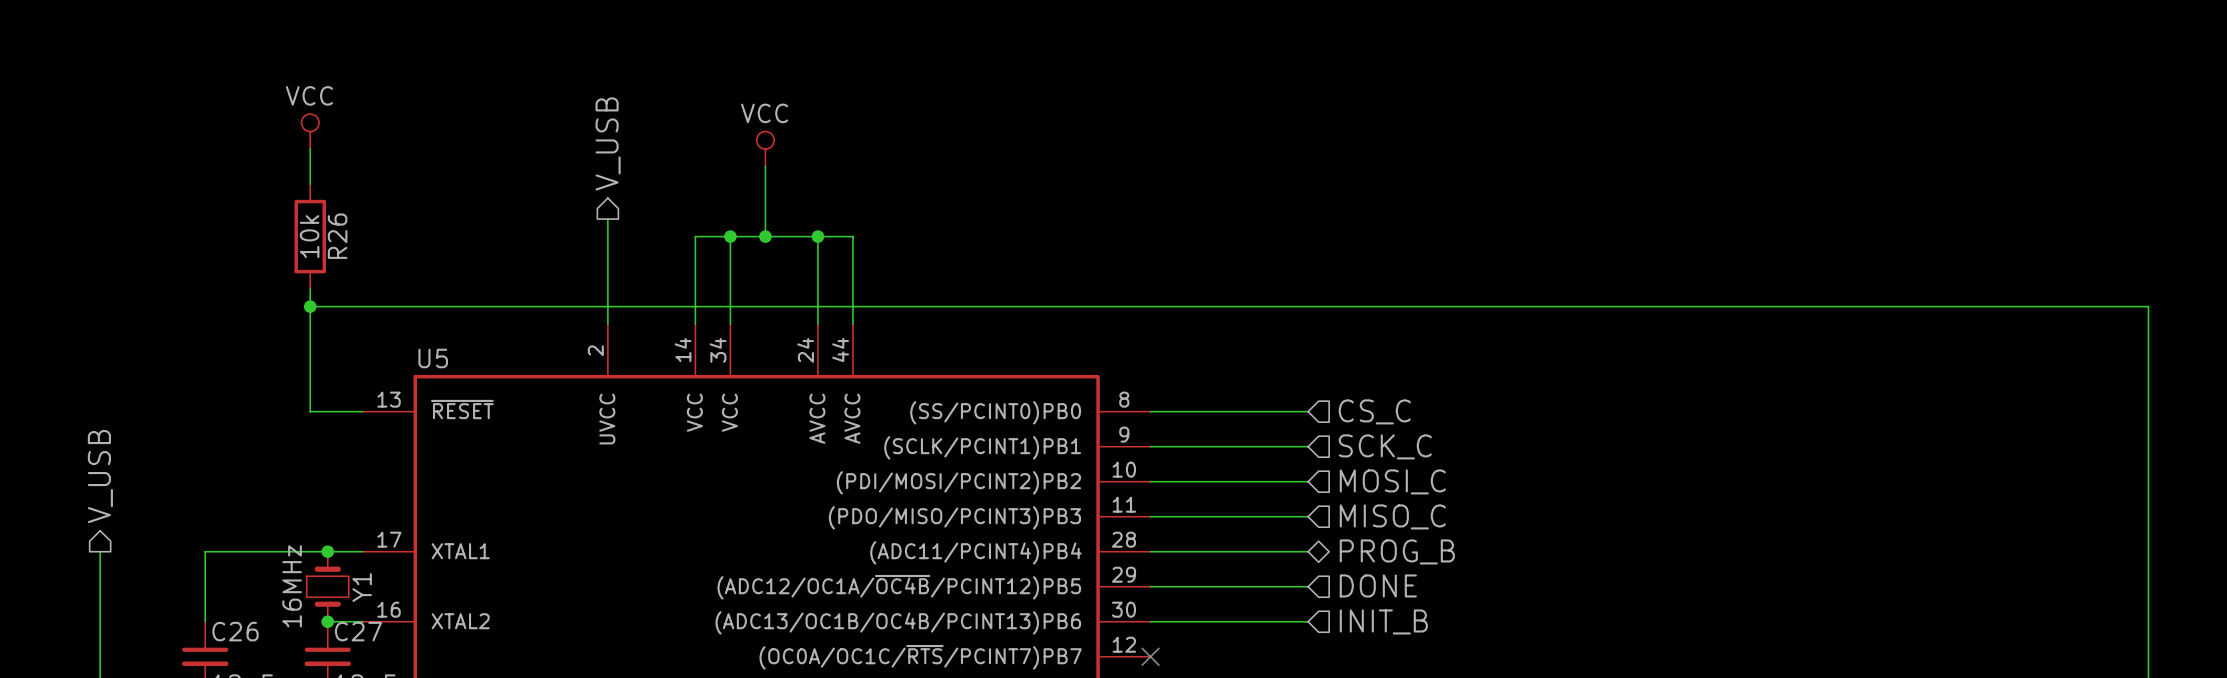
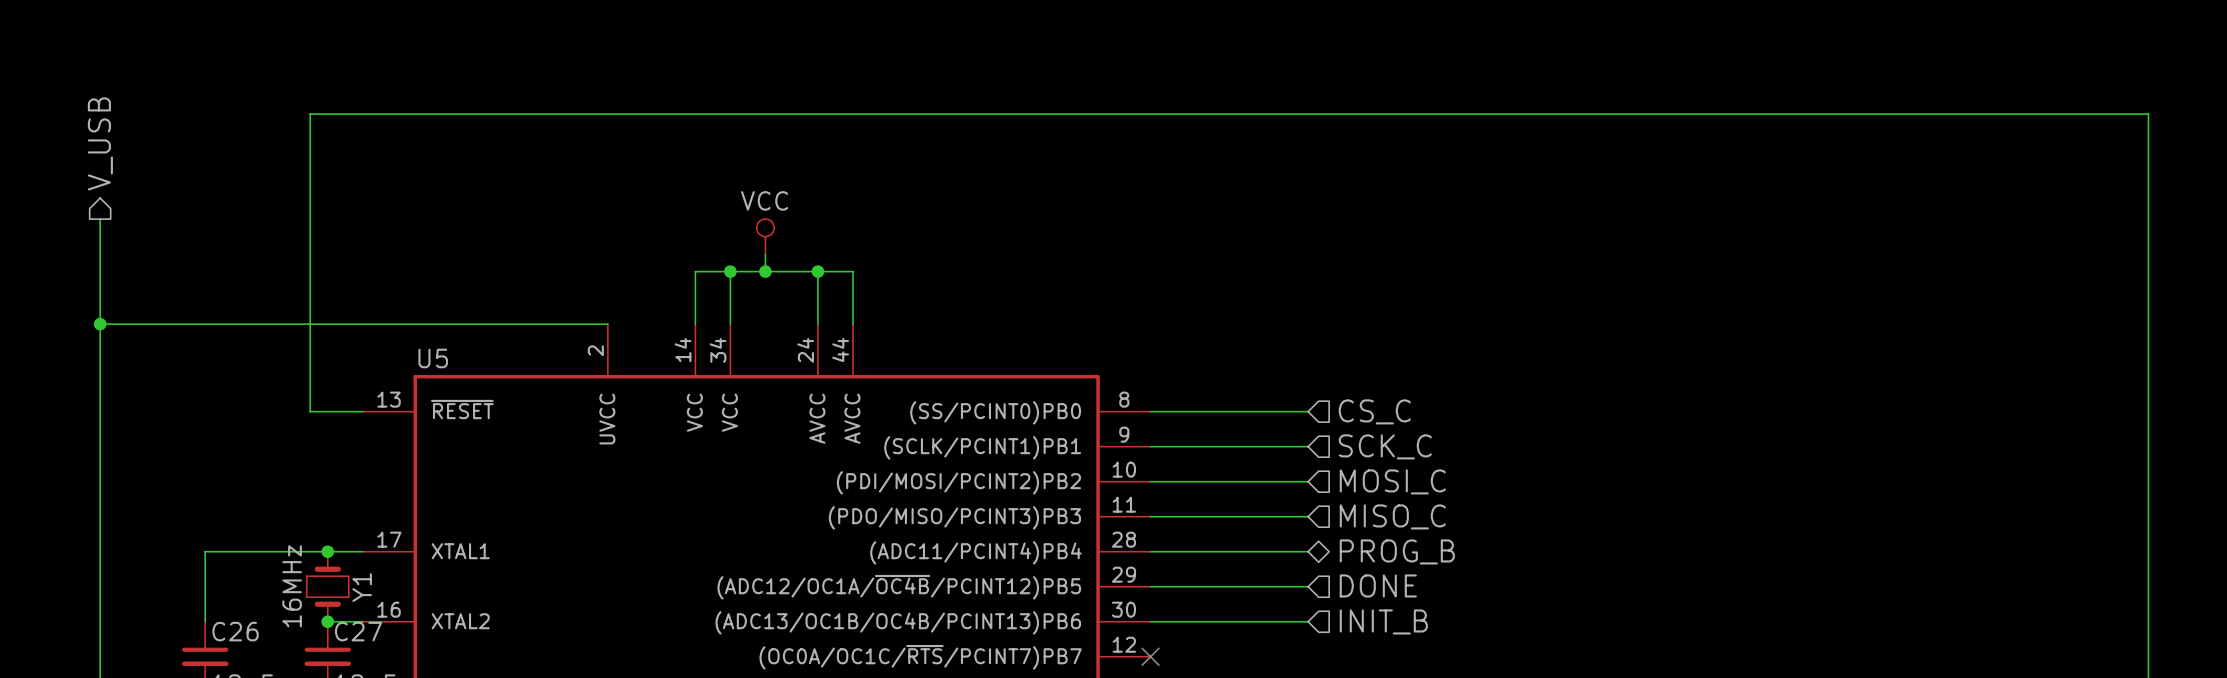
power symbol: VCC (310, 131) -> none
hierarchical label: none -> V_USB (100, 143)
hierarchical label: V_USB (608, 143) -> none
power symbol position: VCC (765, 149) -> VCC (765, 236)
wire: (765, 166) (765, 236) -> none
wire: none -> (310, 184) (310, 289)
wire: none -> (100, 219) (100, 551)
wire: (607, 219) (607, 324) -> (100, 324) (607, 324)
R26: 10k (310, 236) -> none
wire: (730, 236) (730, 271) -> none
junction: (730, 236) -> none
junction: (765, 236) -> none
wire: (817, 236) (817, 271) -> none
junction: (817, 236) -> none
wire: none -> (765, 254) (765, 271)
wire: (695, 271) (695, 236) (852, 236) (852, 271) -> (695, 271) (852, 271)
junction: none -> (730, 271)
junction: none -> (765, 271)
junction: none -> (817, 271)
wire: (310, 306) (2148, 306) -> (310, 149) (310, 114) (2148, 114) (2148, 306)
junction: (310, 306) -> none
junction: none -> (100, 324)
hierarchical label: V_USB (100, 476) -> none

